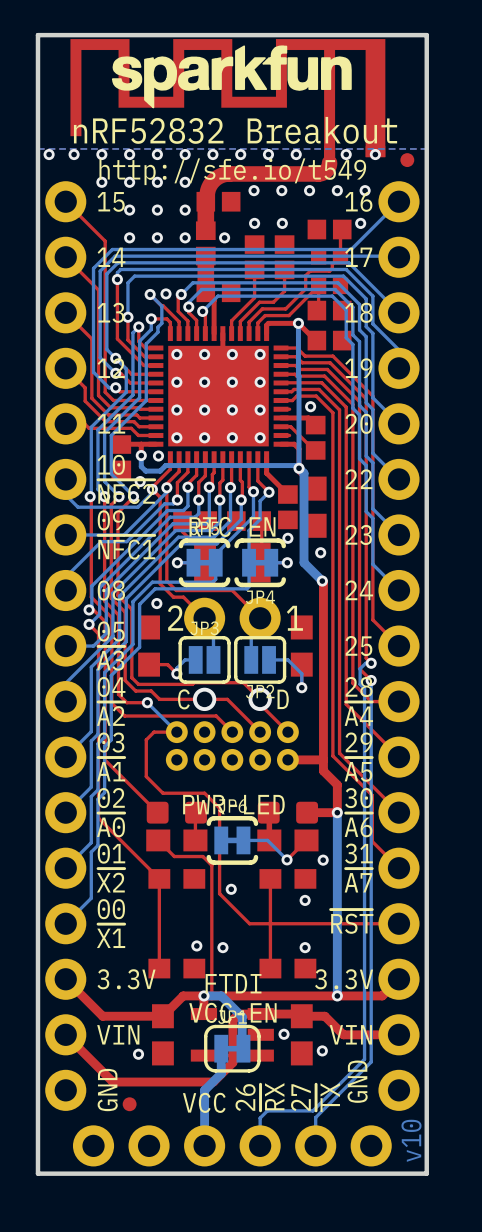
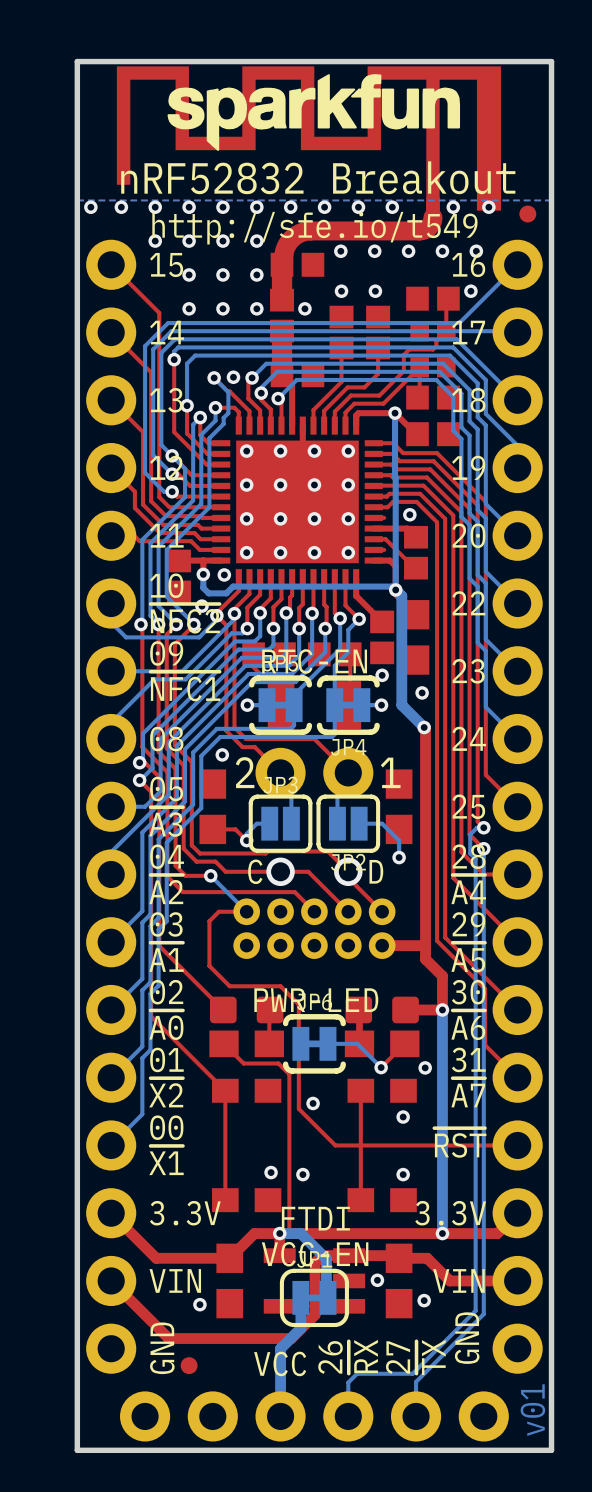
text: v10 (411, 1140) -> v01 (532, 1410)

